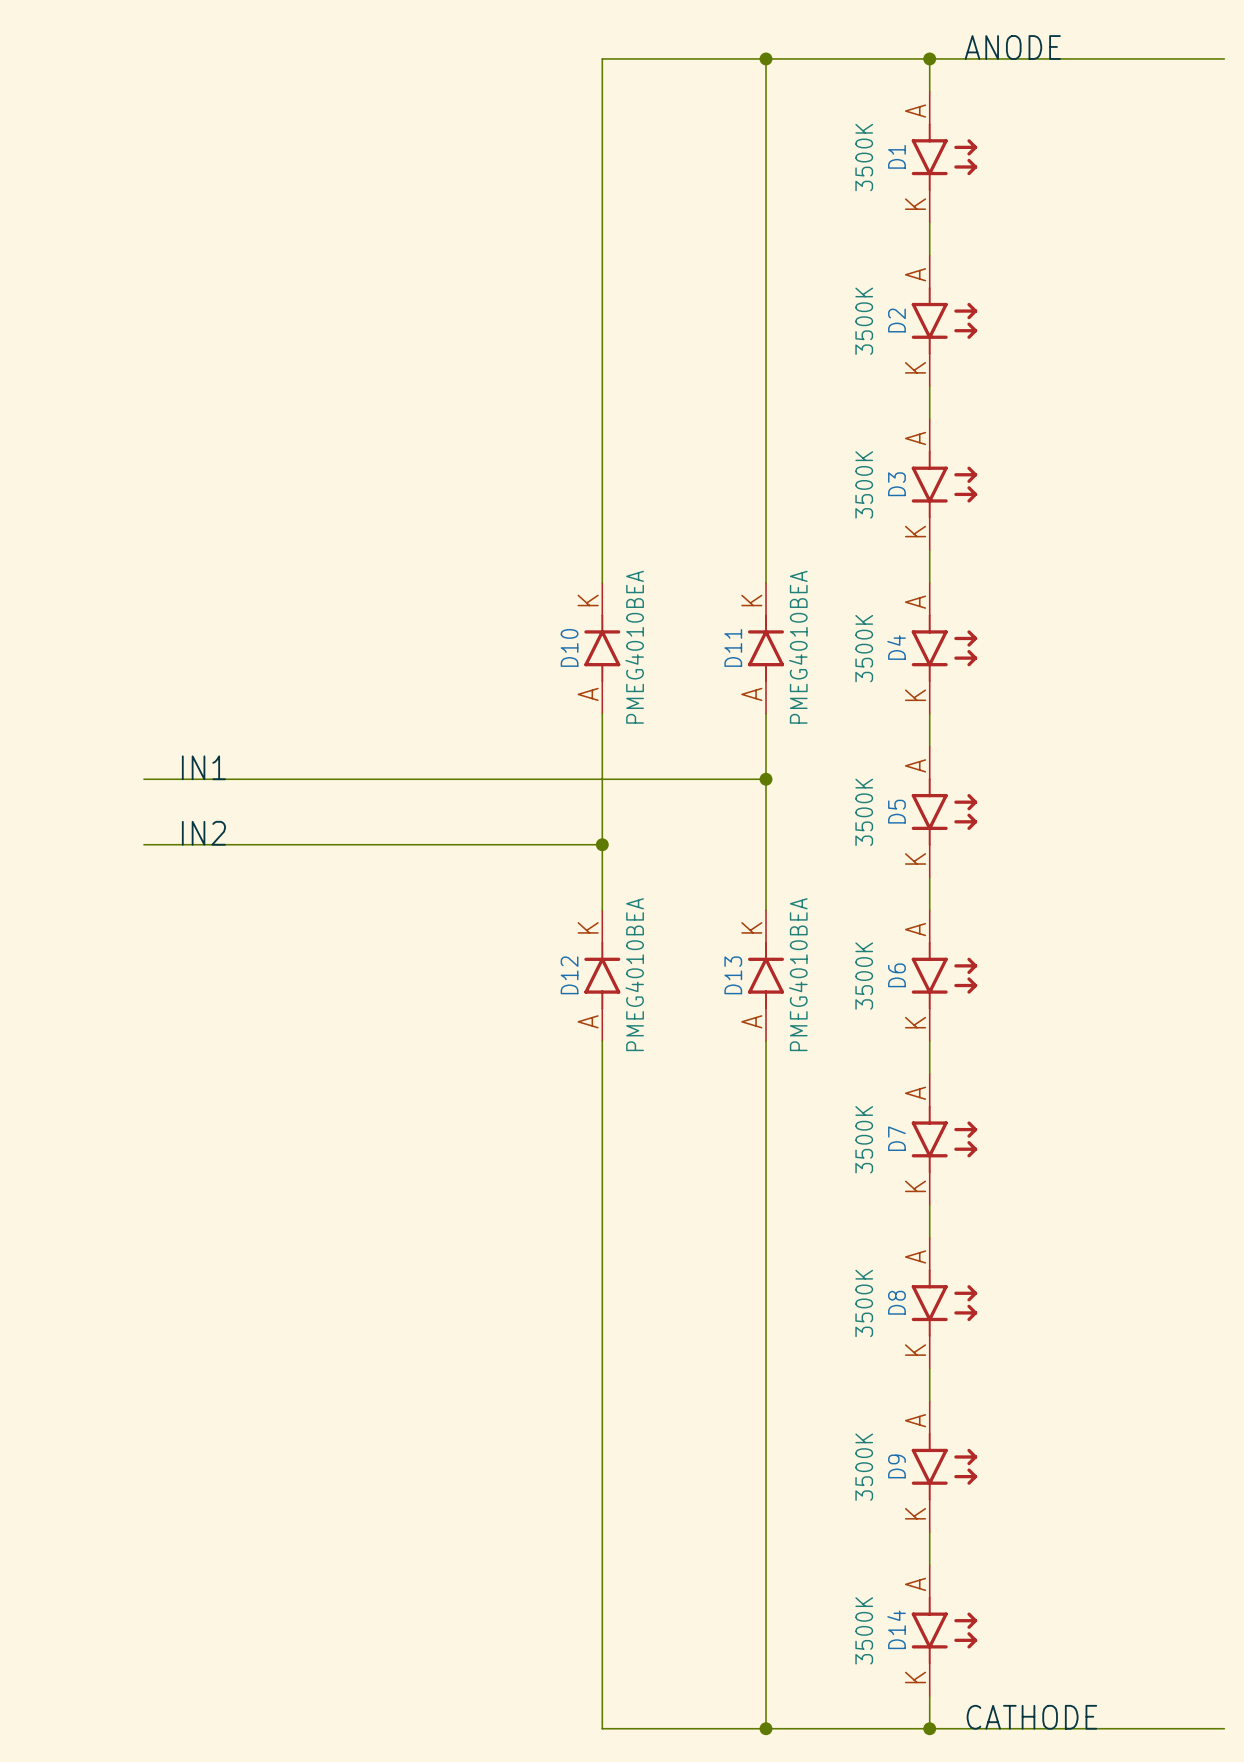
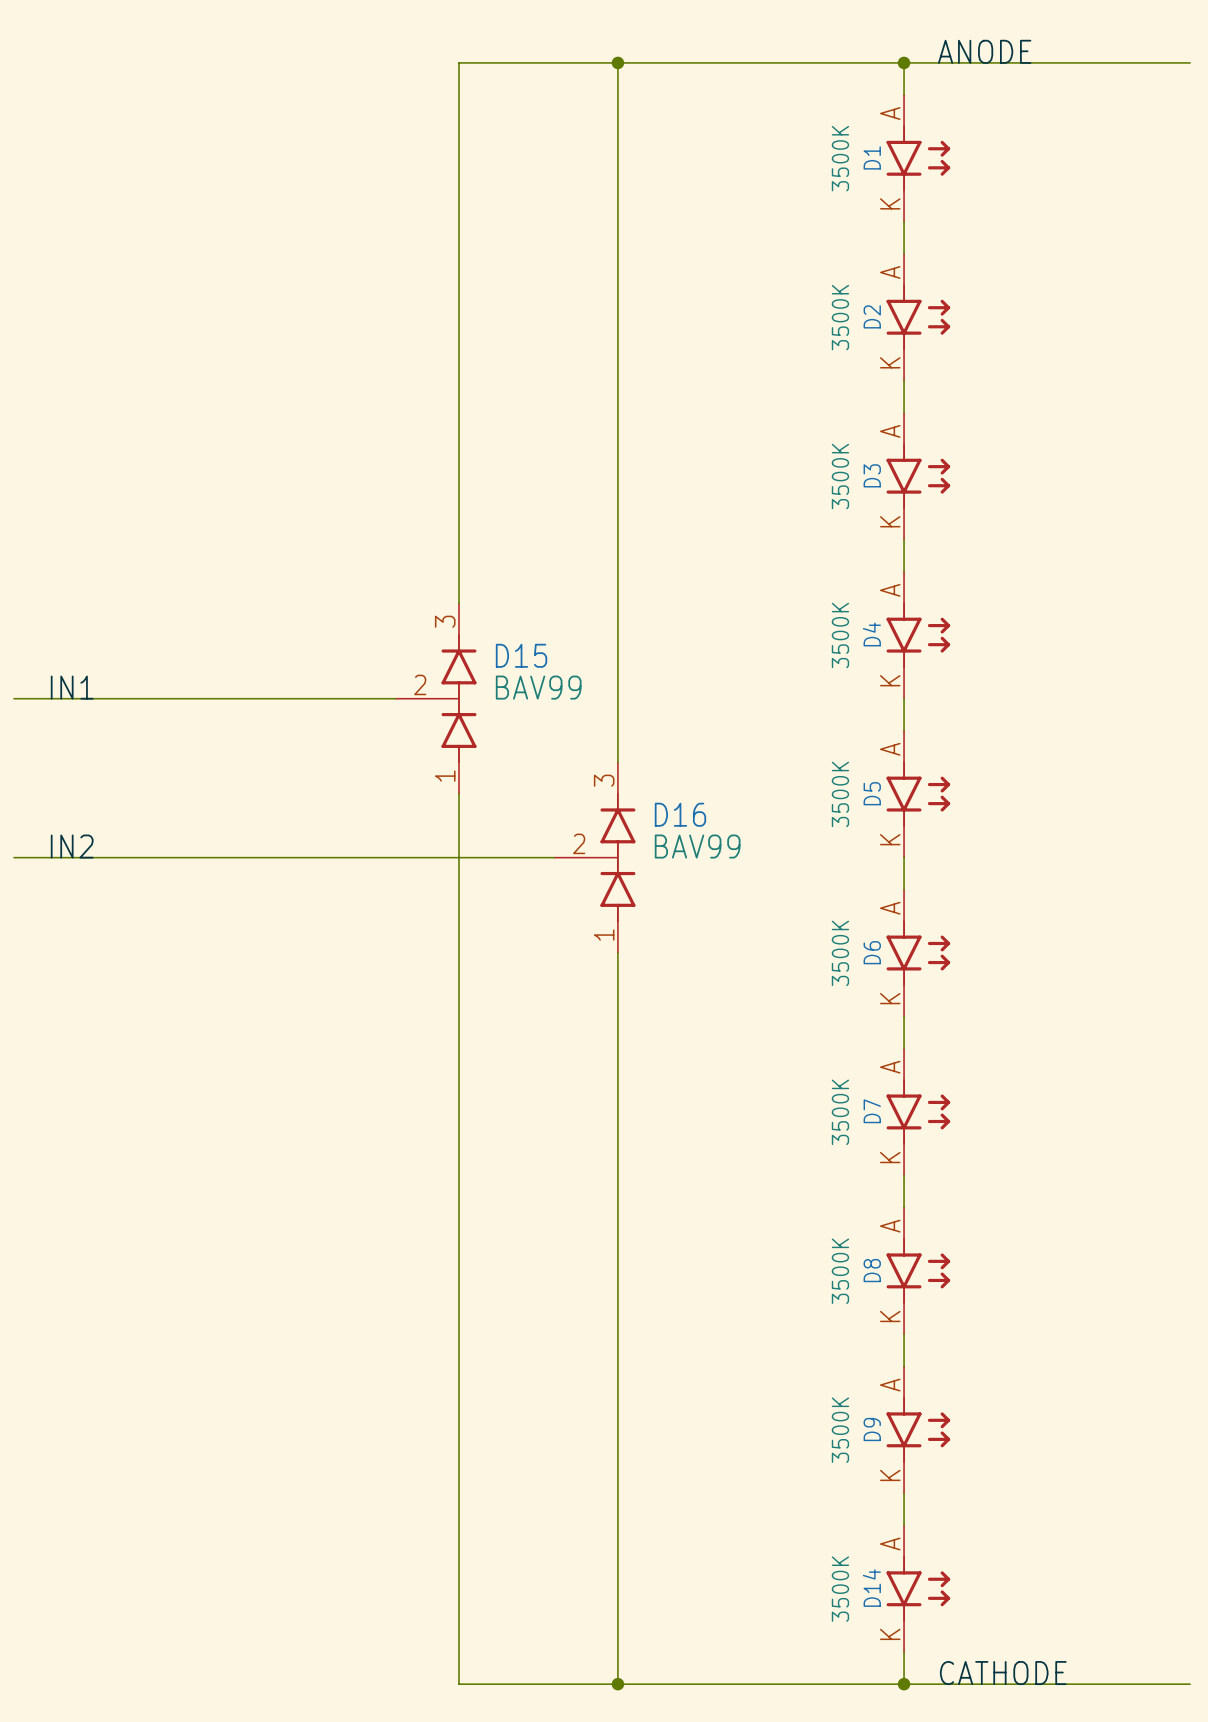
wire: (602, 58) (602, 582) -> (586, 62) (458, 62) (458, 603)
wire: none -> (617, 62) (617, 762)
junction: none -> (617, 62)
wire: (766, 58) (766, 582) -> none
junction: (766, 58) -> none
D10: PMEG4010BEA (602, 648) -> none
D11: PMEG4010BEA (766, 648) -> none
wire: none -> (13, 698) (395, 698)
D15: none -> BAV99 (435, 698)
wire: (602, 713) (602, 910) -> none
wire: (766, 713) (766, 910) -> none
label position: IN1 (203, 767) -> IN1 (72, 687)
wire: (143, 779) (766, 779) -> none
junction: (766, 779) -> none
label position: IN2 (203, 833) -> IN2 (72, 846)
wire: (143, 844) (602, 844) -> none
junction: (602, 844) -> none
wire: none -> (13, 857) (554, 857)
D16: none -> BAV99 (594, 857)
D12: PMEG4010BEA (602, 975) -> none
wire: none -> (617, 953) (617, 1684)
D13: PMEG4010BEA (766, 975) -> none
wire: (602, 1041) (602, 1728) -> (458, 794) (458, 1684) (586, 1684)
wire: (766, 1041) (766, 1728) -> none
junction: none -> (617, 1684)
junction: (766, 1728) -> none

